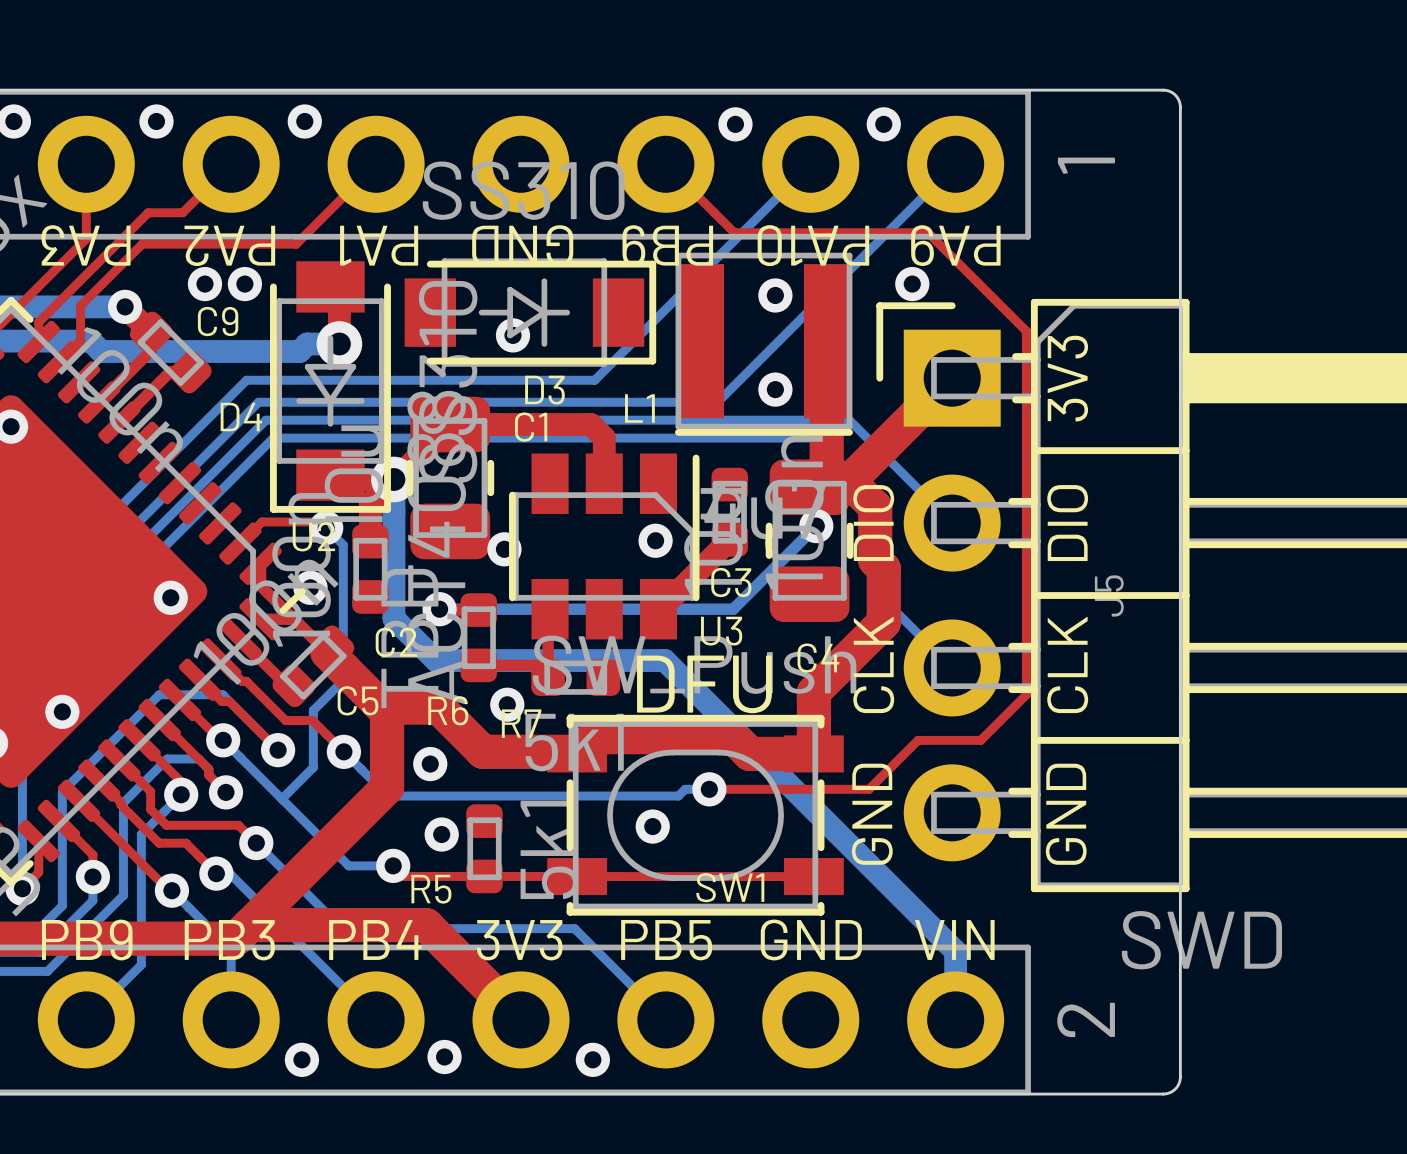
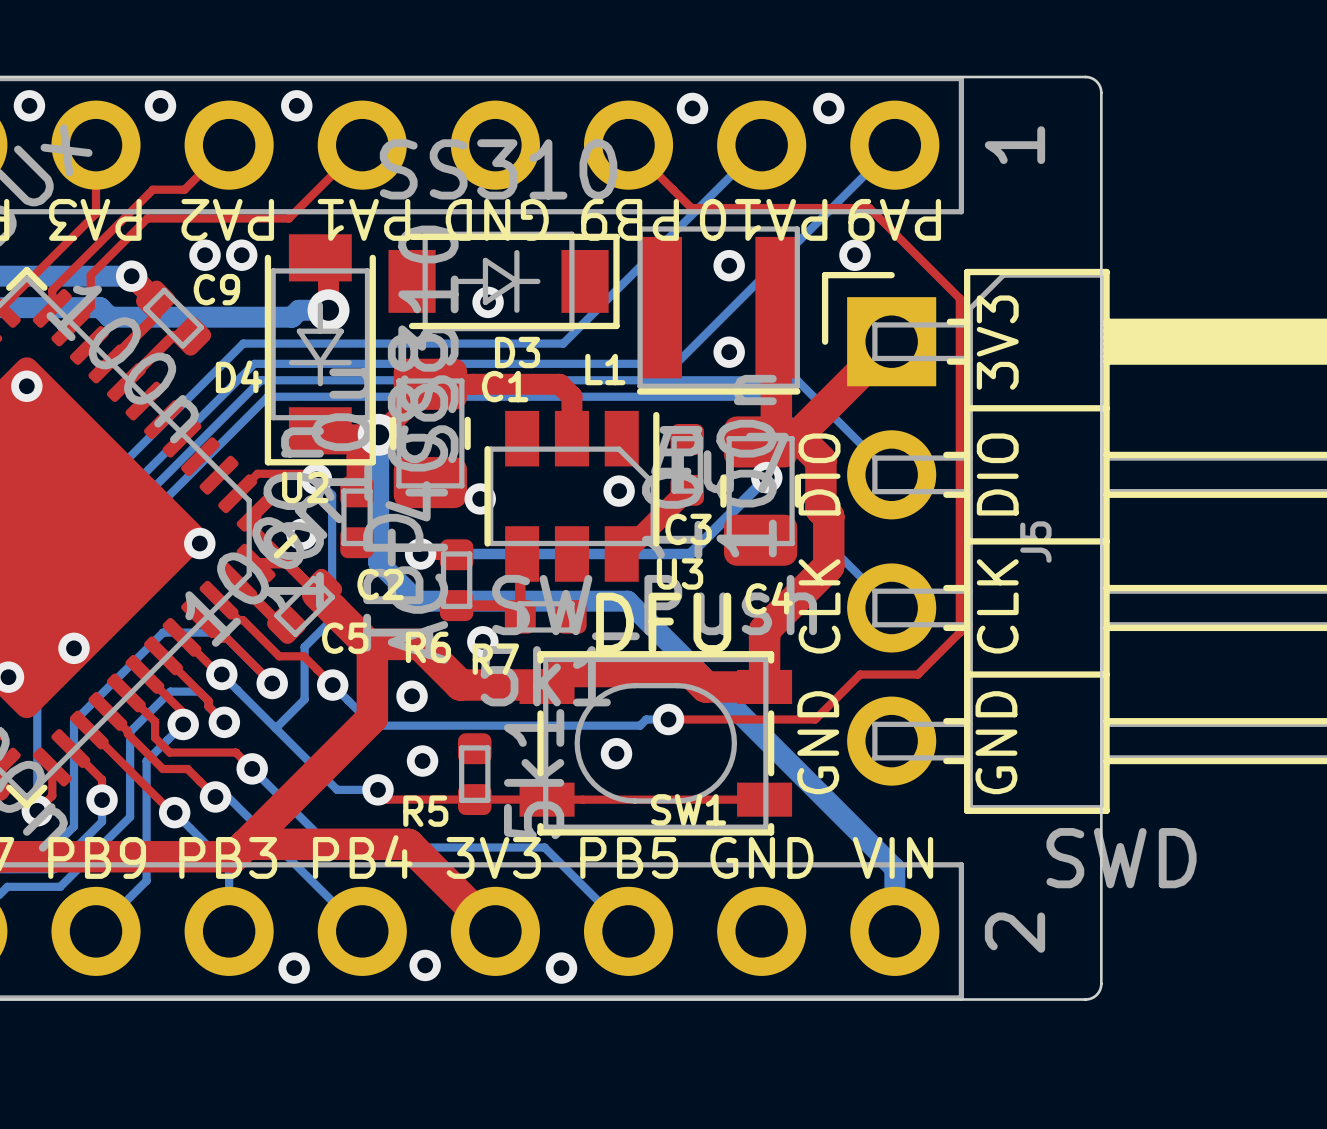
via position: (170, 597) -> (199, 543)
R5 position: (484, 848) -> (474, 774)

